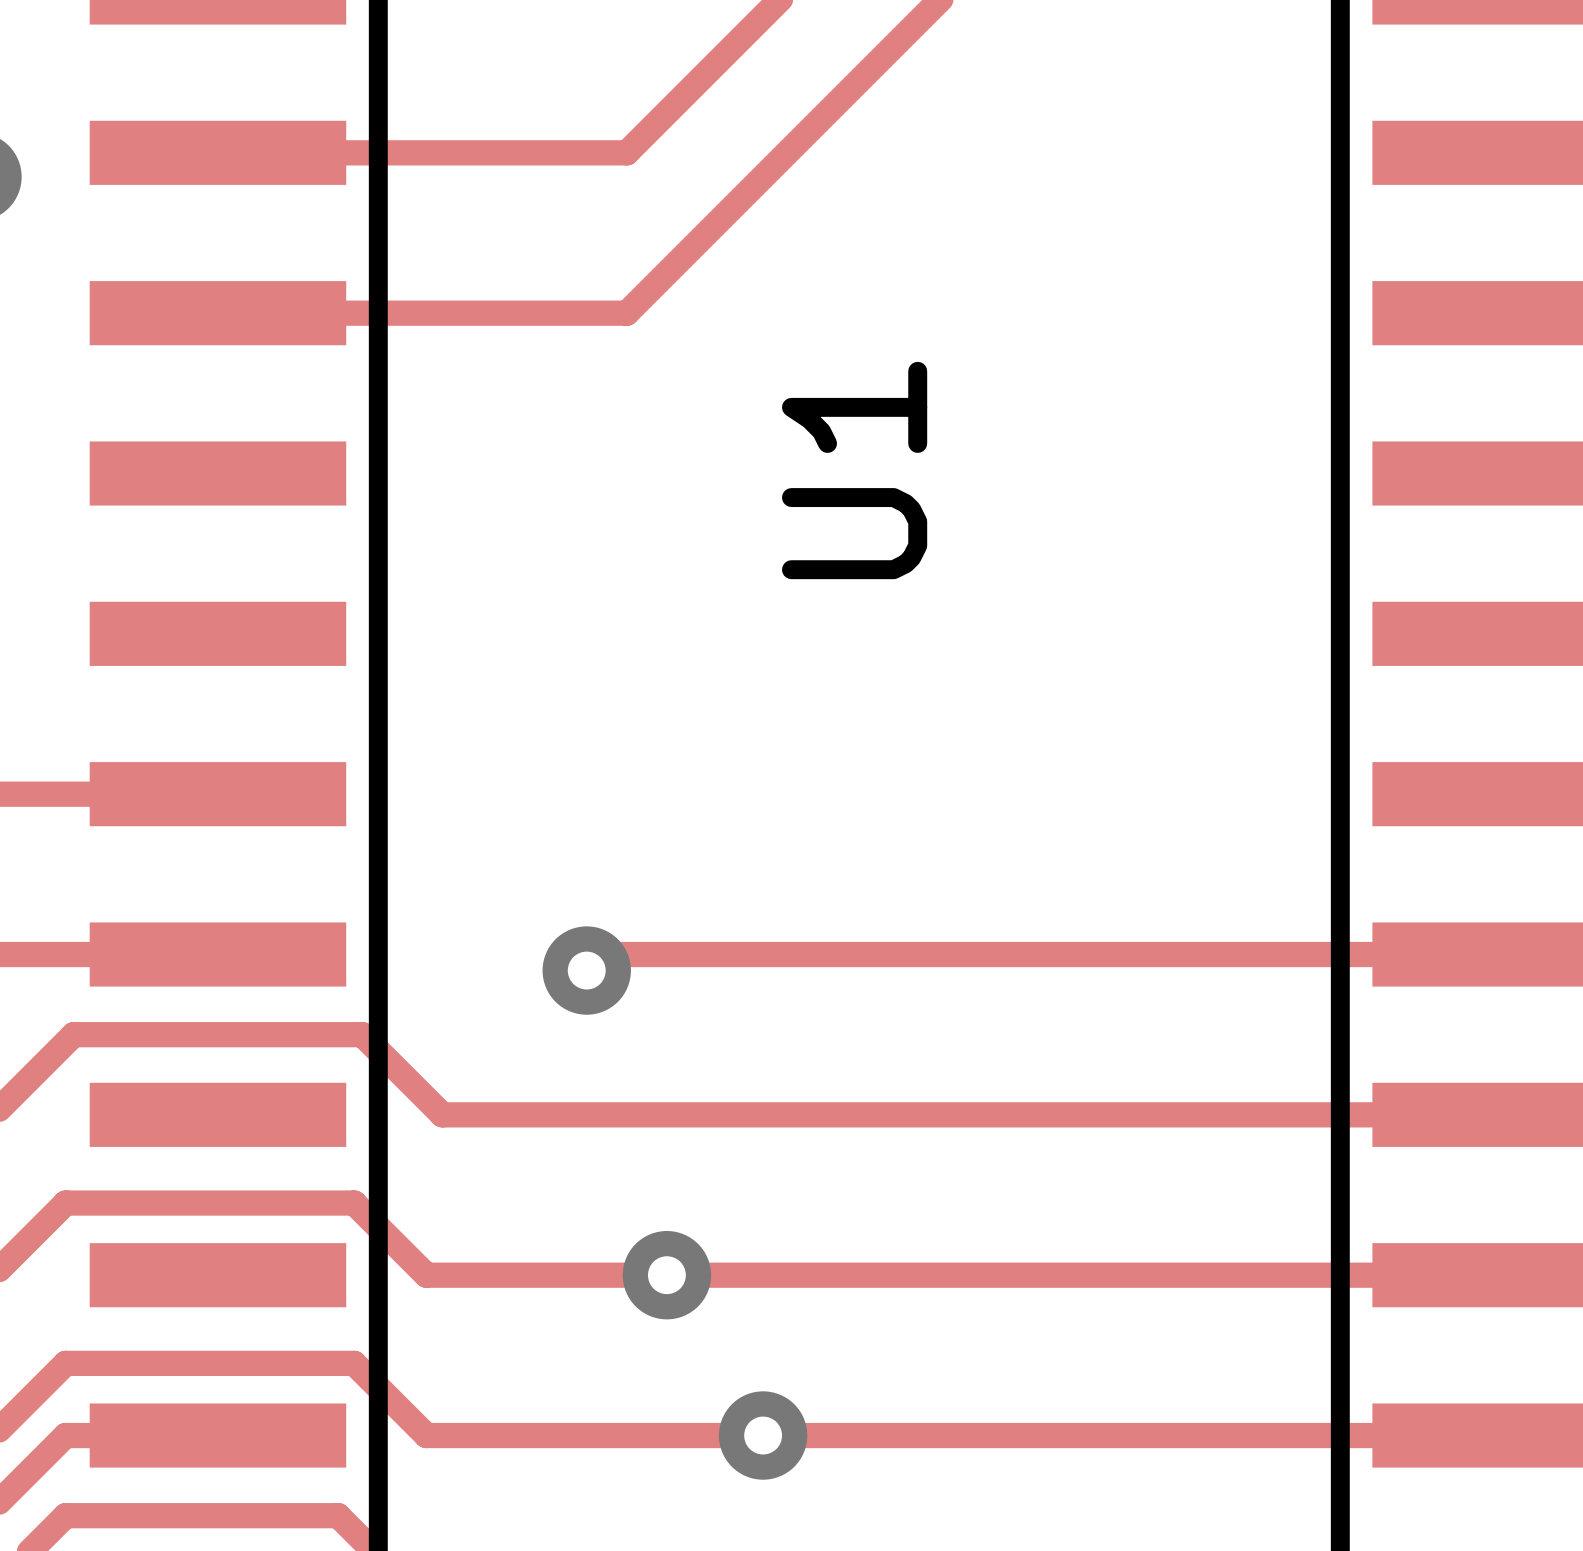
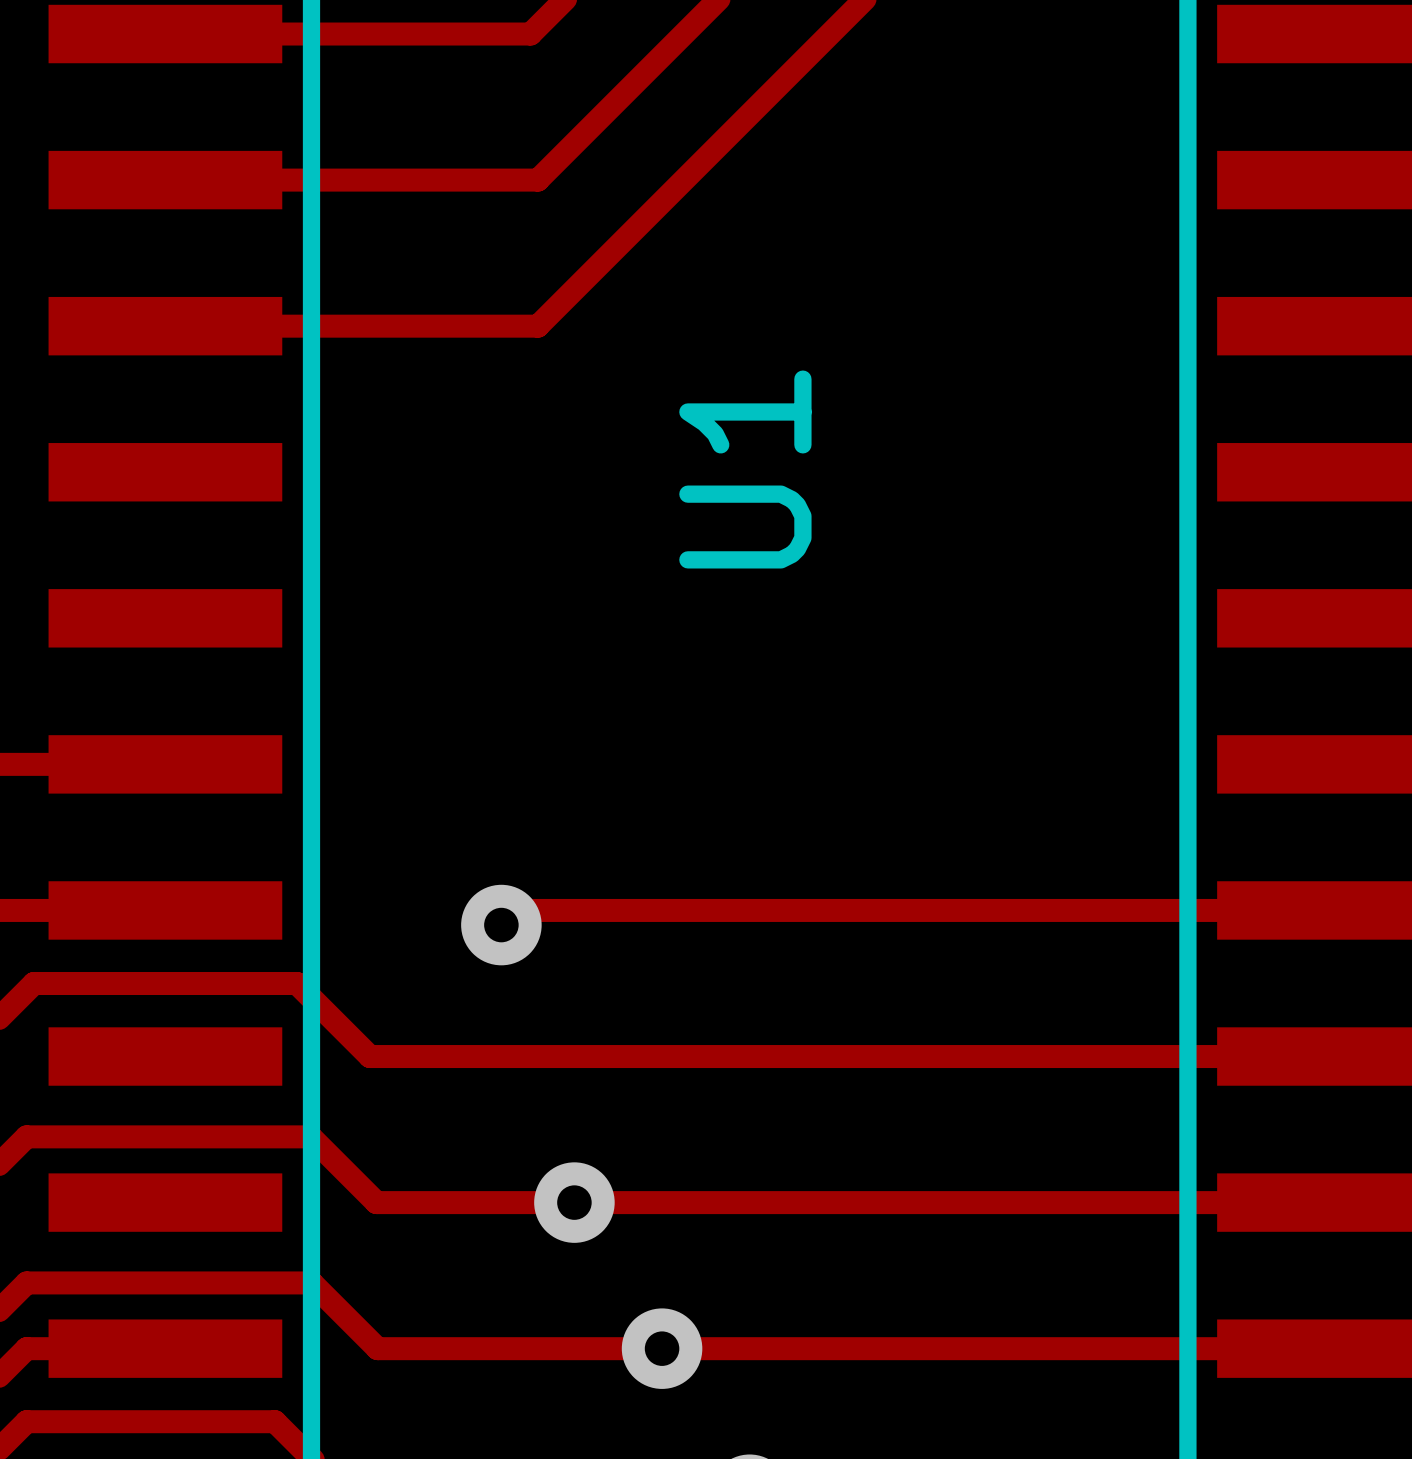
track: (354, 1203) (426, 1275) (449, 1275) -> (289, 1136) (310, 1136) (376, 1202)
track: (354, 1363) (426, 1435) (450, 1435) -> (289, 1282) (311, 1282) (377, 1348)

